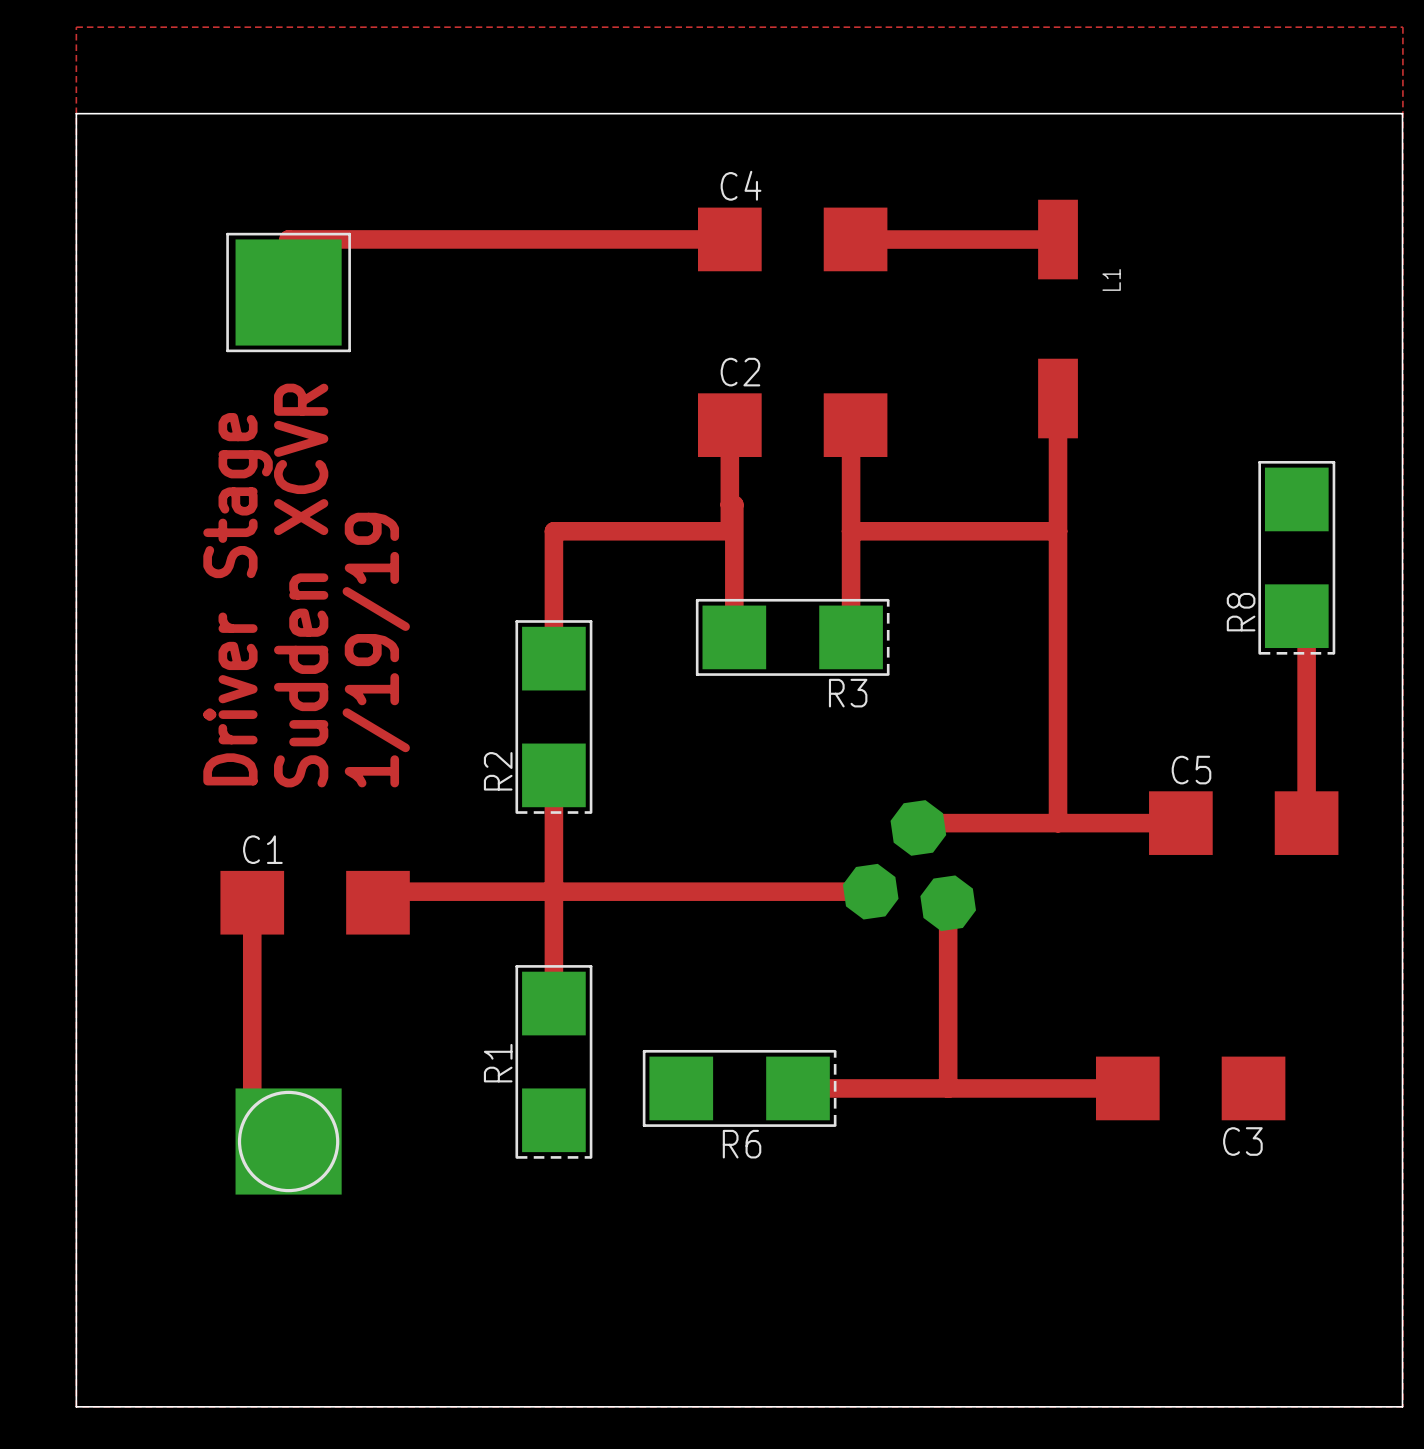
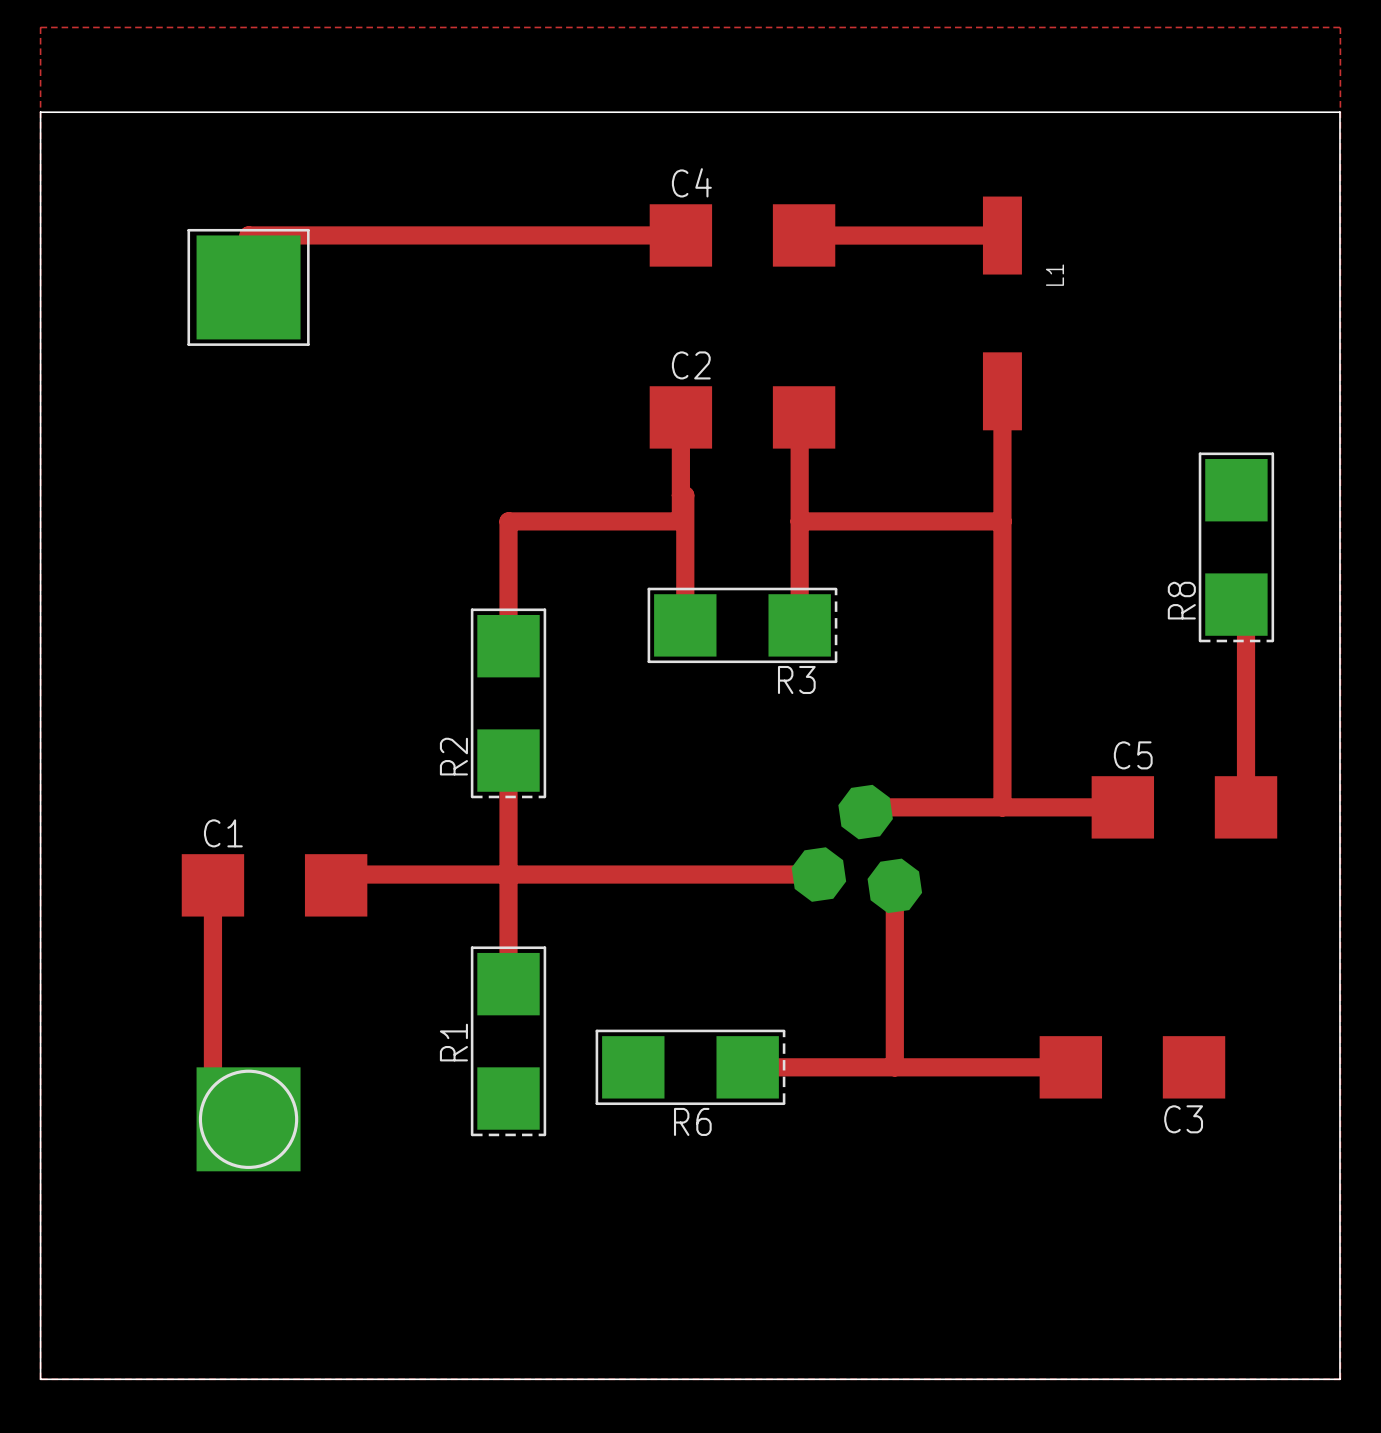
text: Sudden XCVR (301, 585) -> none
text: Driver Stage (238, 599) -> none
text: 1/19/19 (376, 650) -> none

